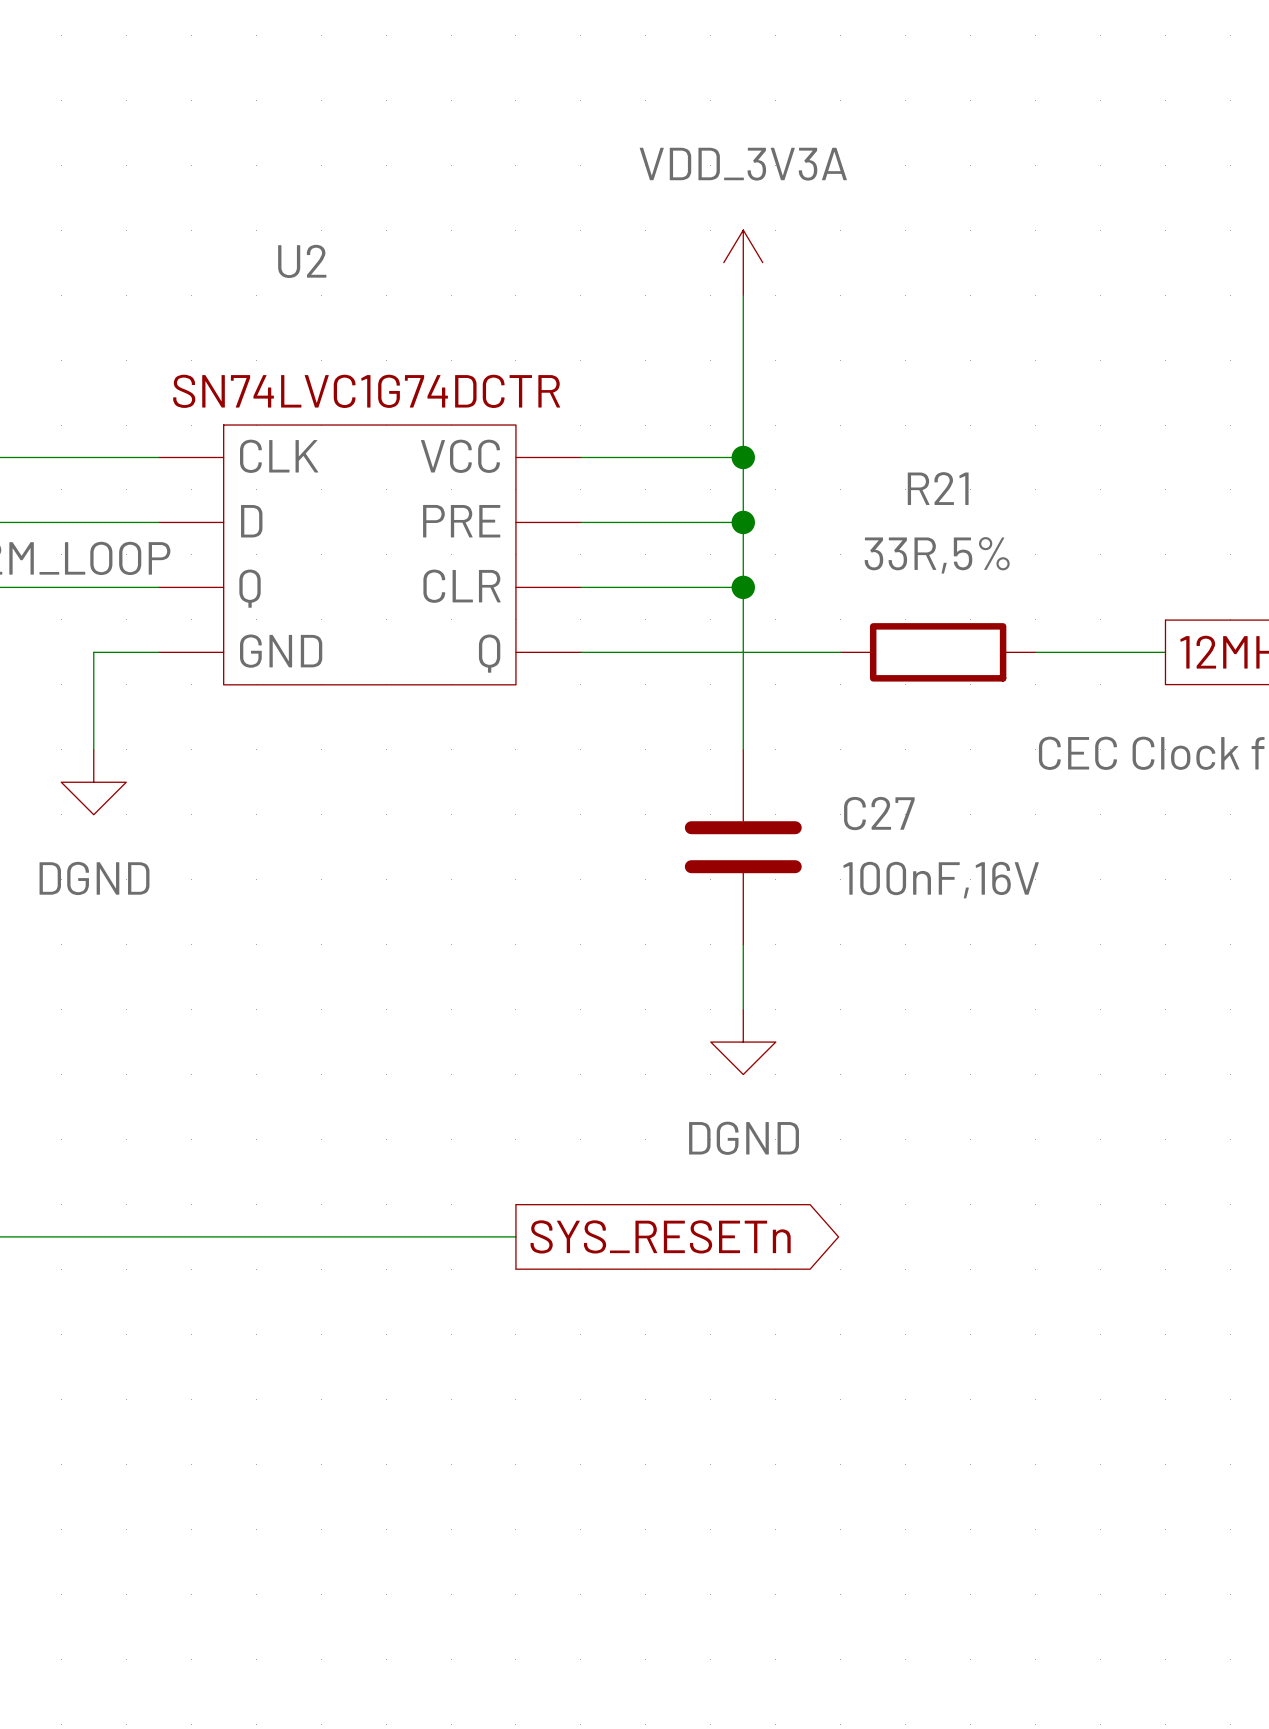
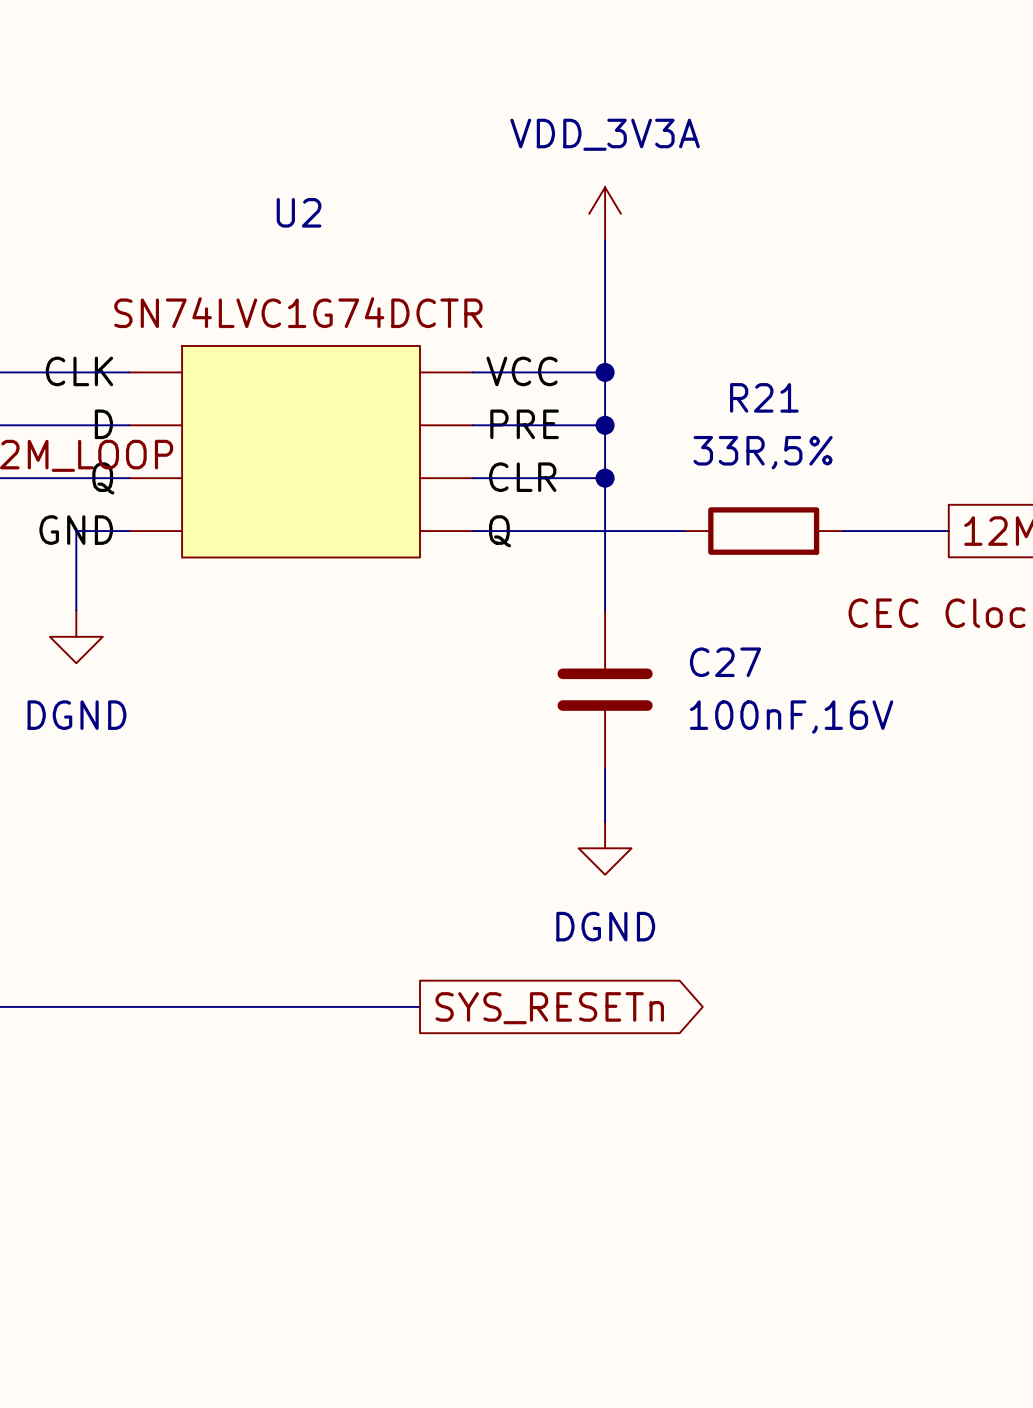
U2 name position: U2 (302, 261) -> U2 (299, 212)
U2 symbol: [158, 425, 581, 685] -> [129, 345, 473, 558]

